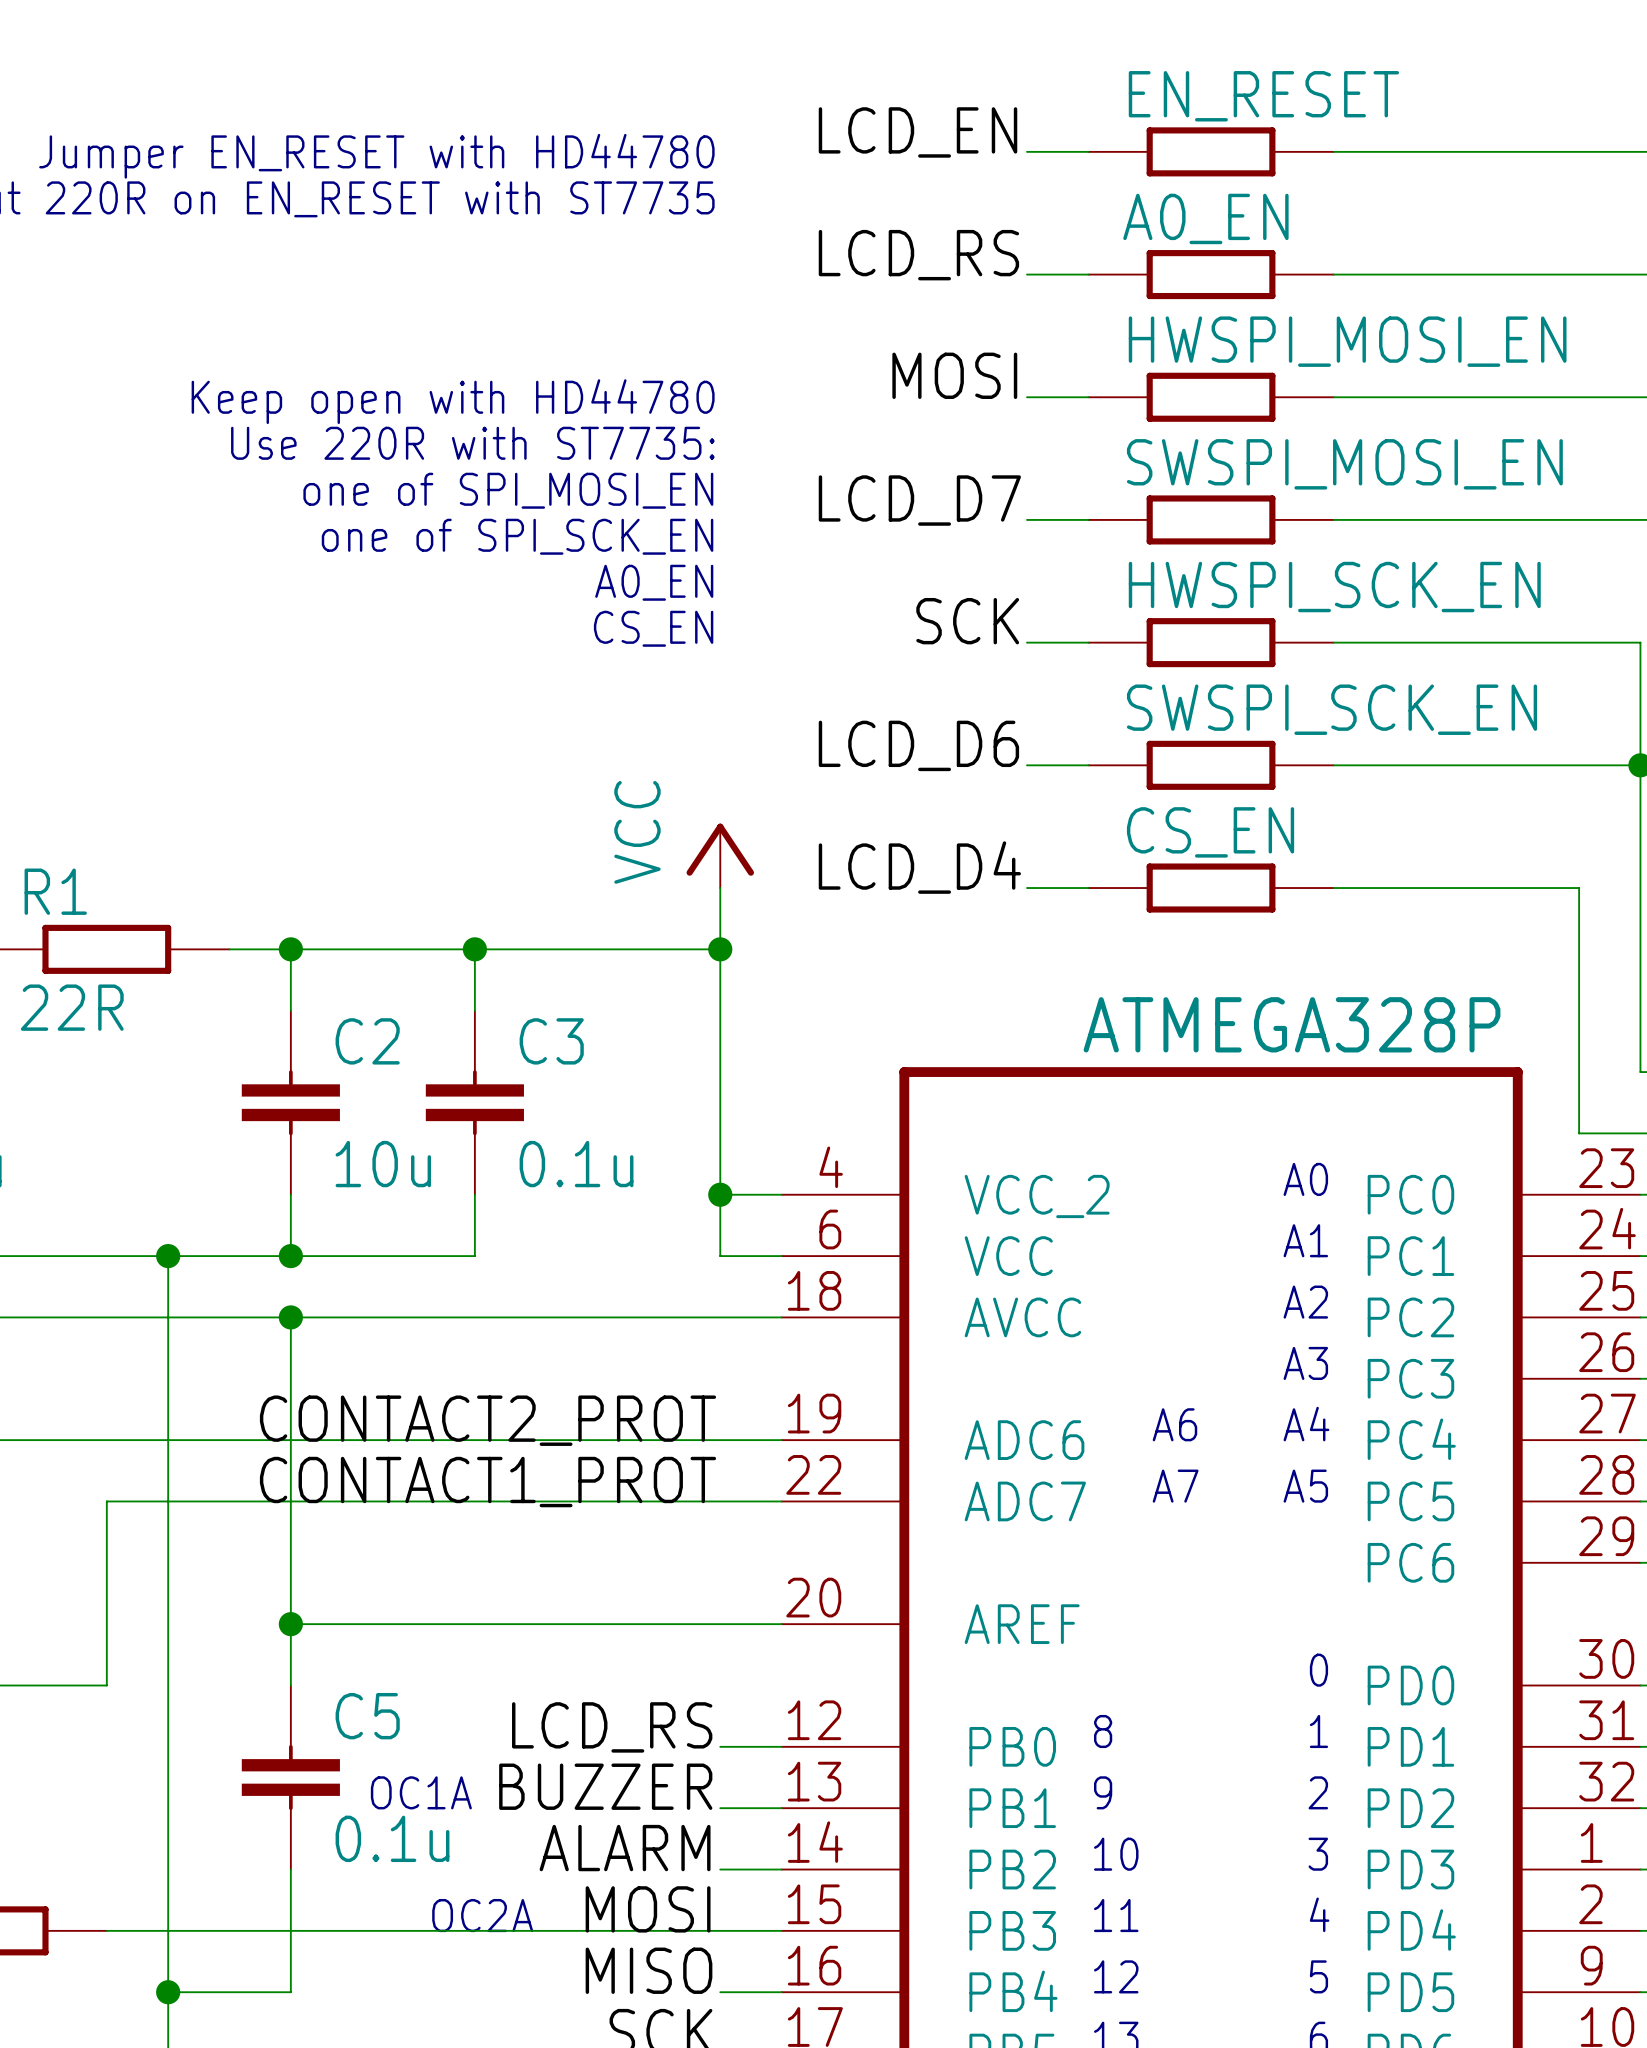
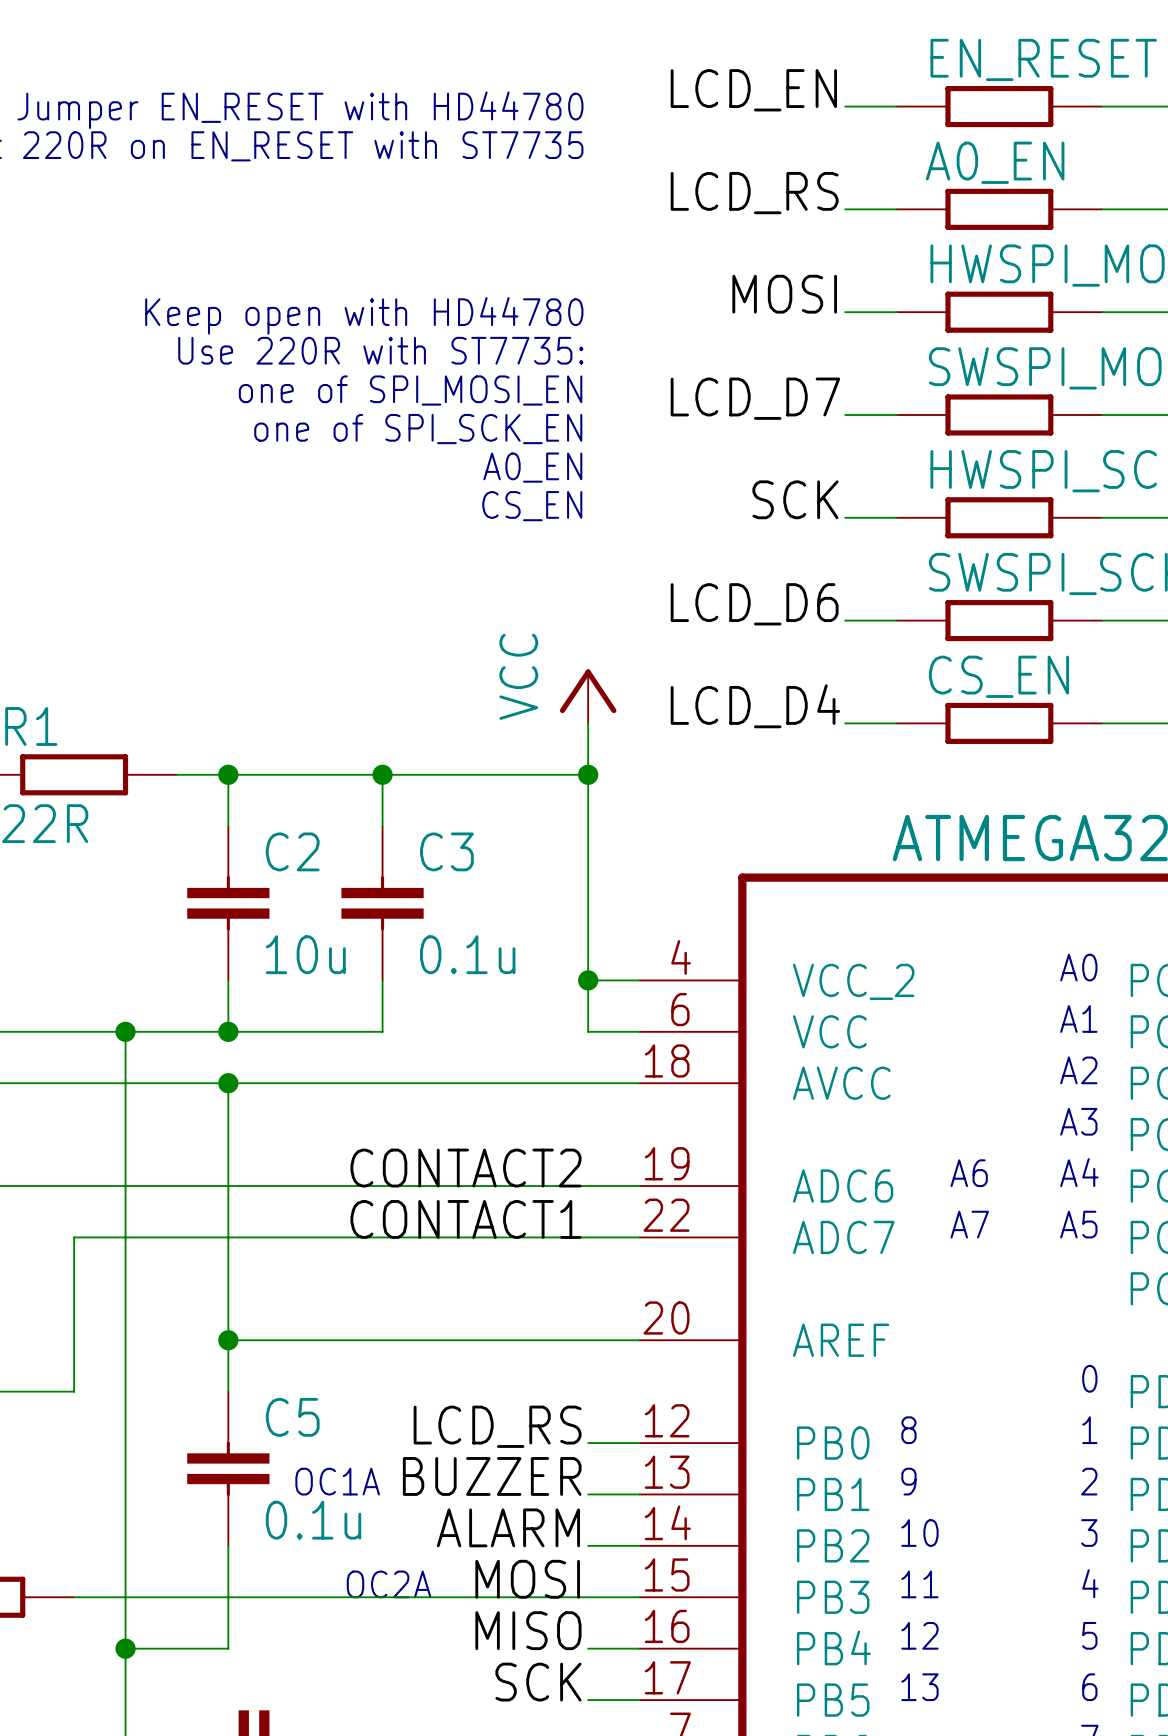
label: CONTACT2_PROT (487, 1420) -> CONTACT2 (465, 1168)
label: CONTACT1_PROT (487, 1482) -> CONTACT1 (465, 1219)

